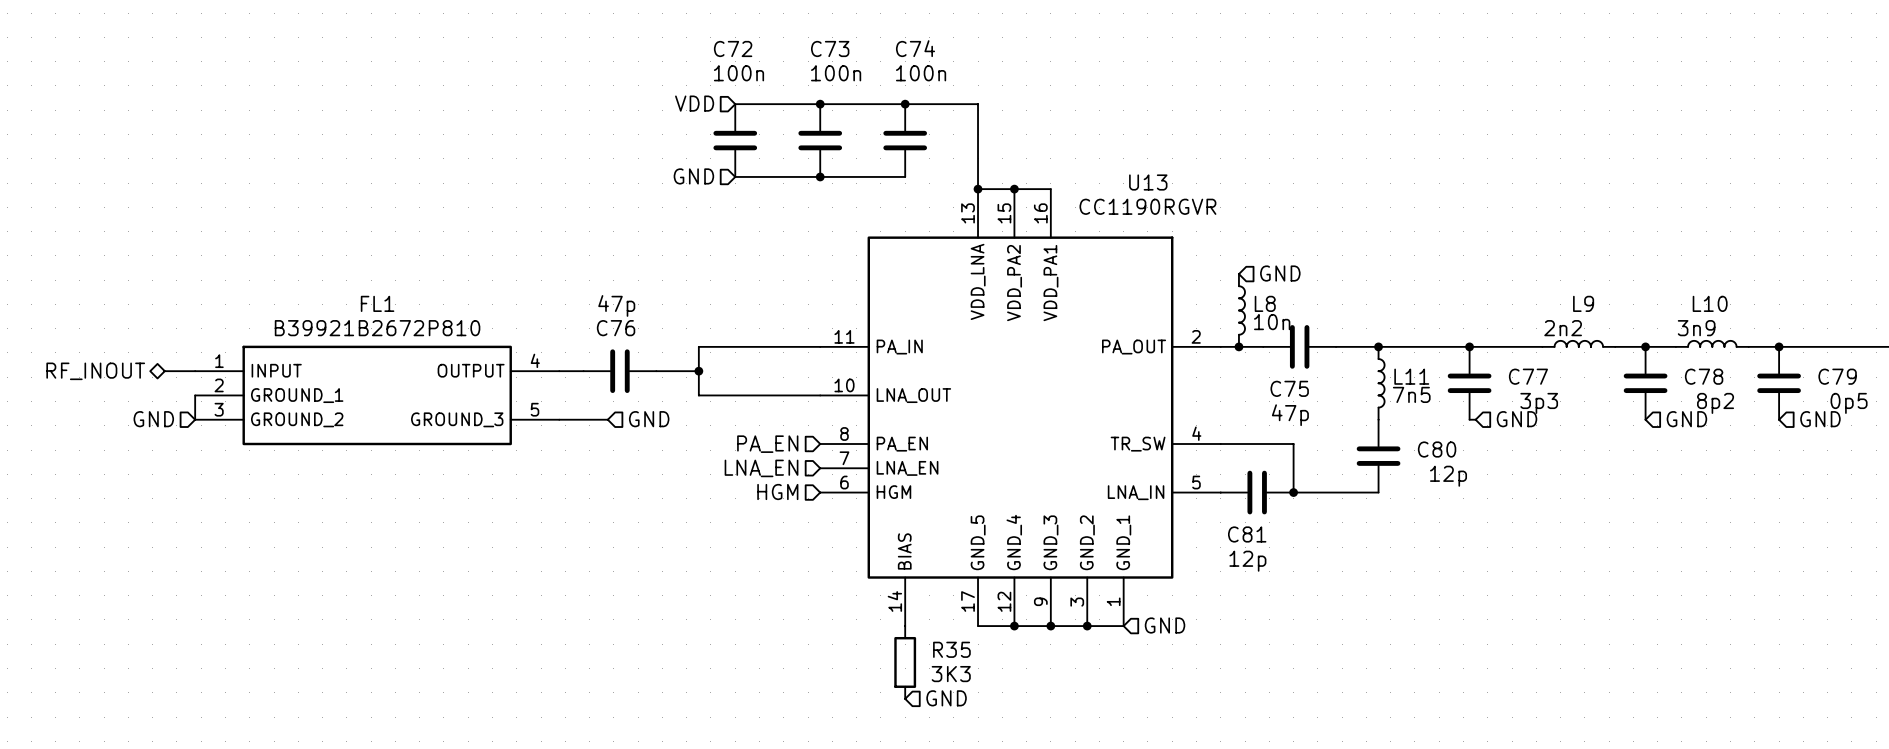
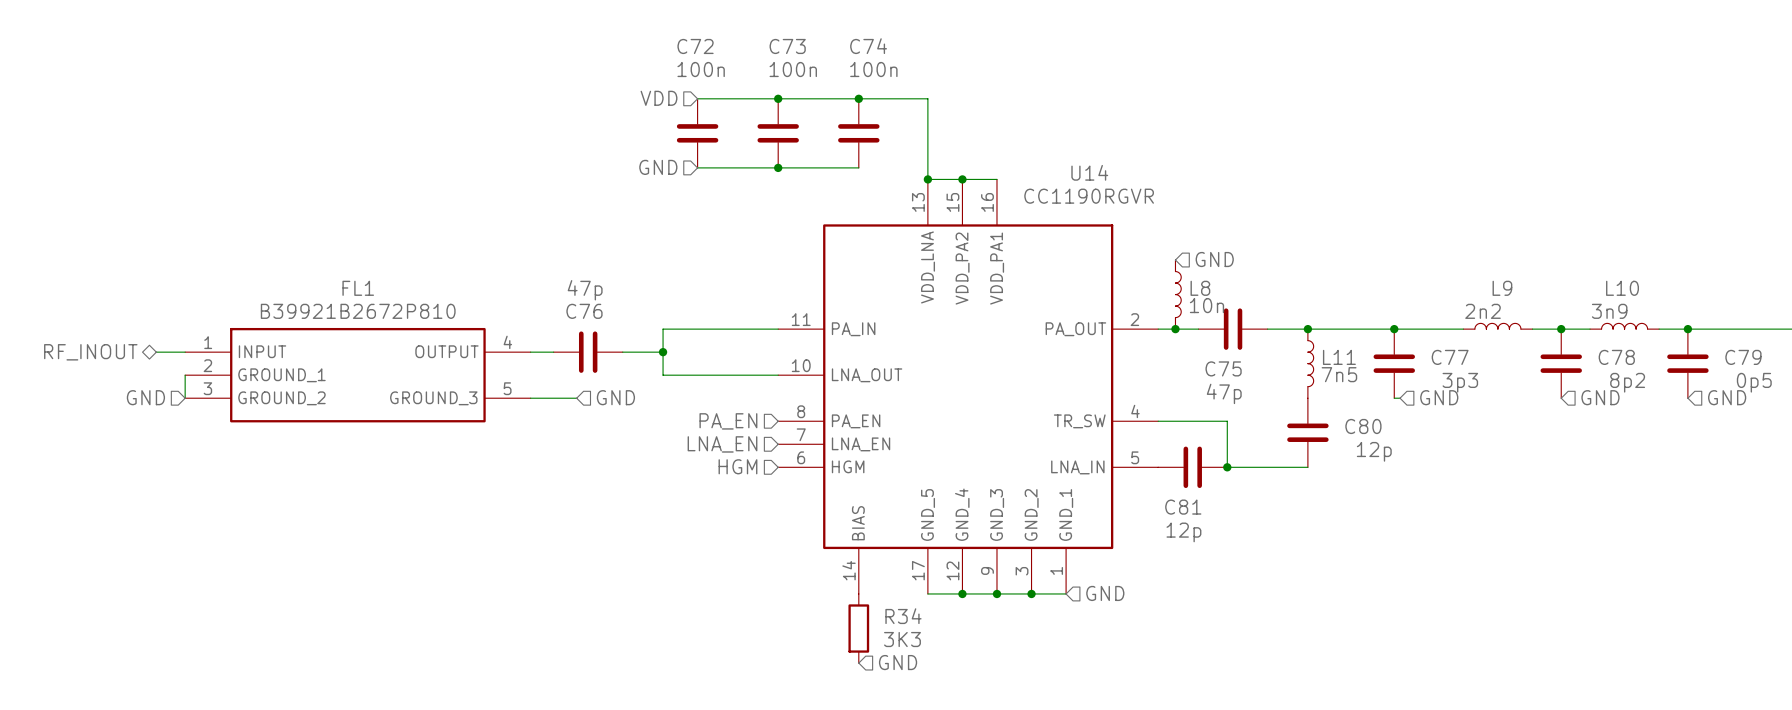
U13 name: U13 (1148, 182) -> U14 (1089, 172)
R35 name: R35 (951, 649) -> R34 (903, 616)

